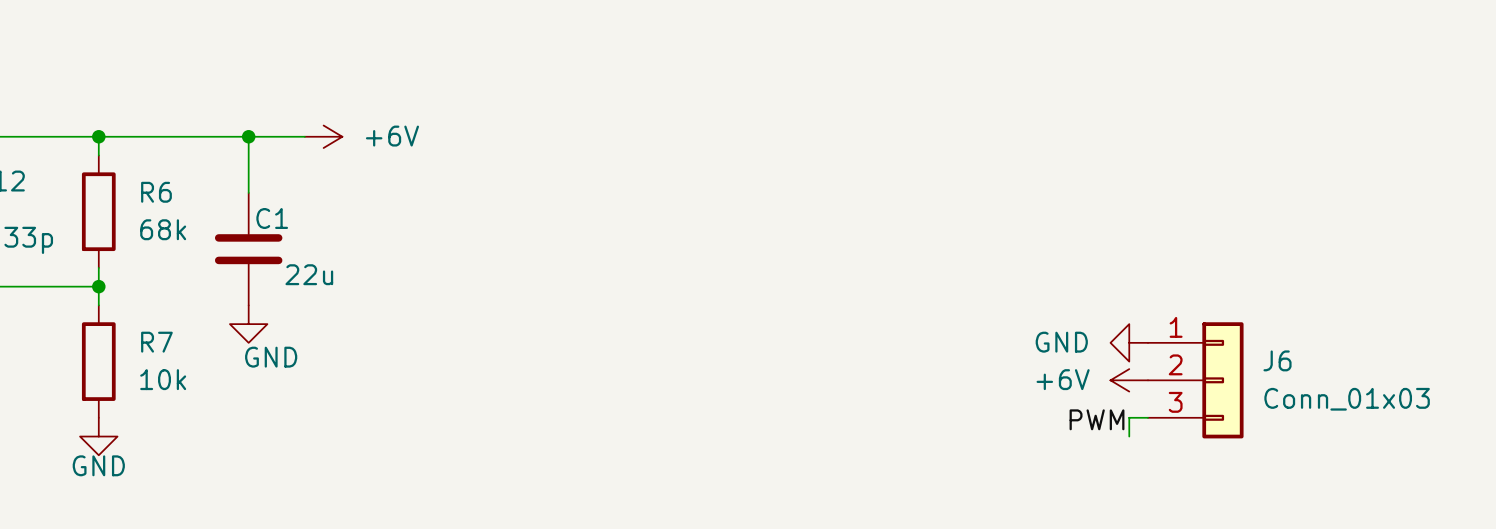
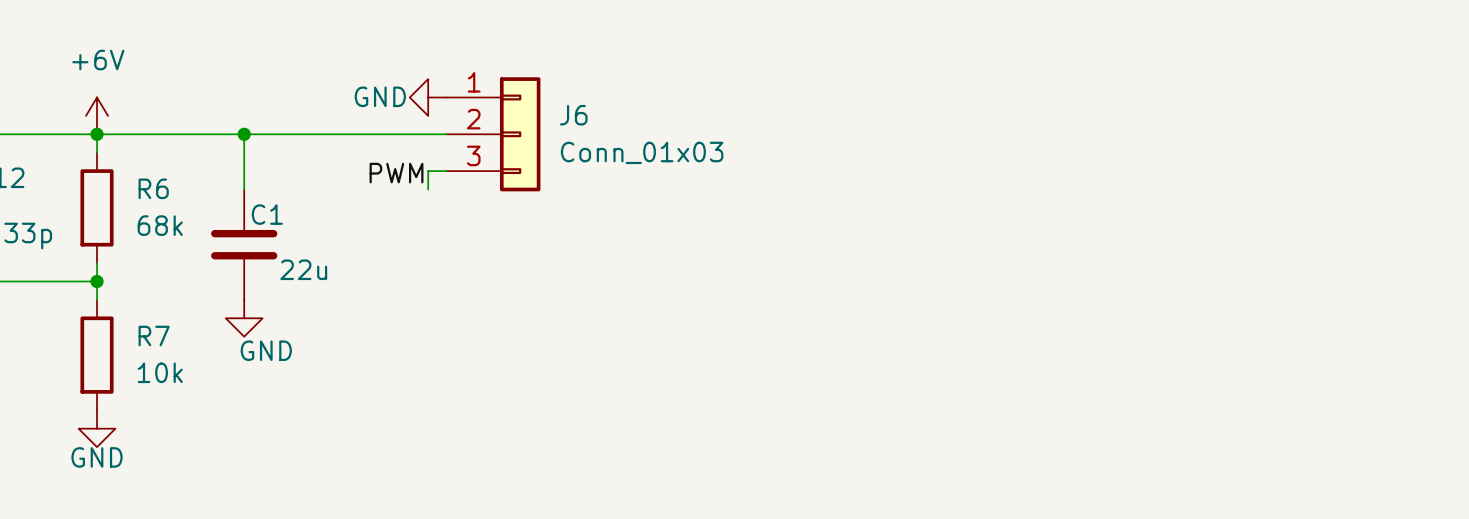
power symbol: none -> GND (428, 97)
wire: none -> (299, 134) (446, 134)
power symbol rotation: 0° (323, 136) -> 90° counterclockwise (97, 115)
power symbol position: +6V (323, 136) -> +6V (97, 115)
wire: none -> (446, 171) (428, 171) (428, 189)
label: none -> PWM (396, 173)
power symbol: GND (1129, 342) -> none
power symbol: +6V (1129, 380) -> none
J6 position: (1195, 380) -> (493, 134)
wire: (1148, 417) (1129, 417) (1129, 436) -> none
label: PWM (1097, 419) -> none

